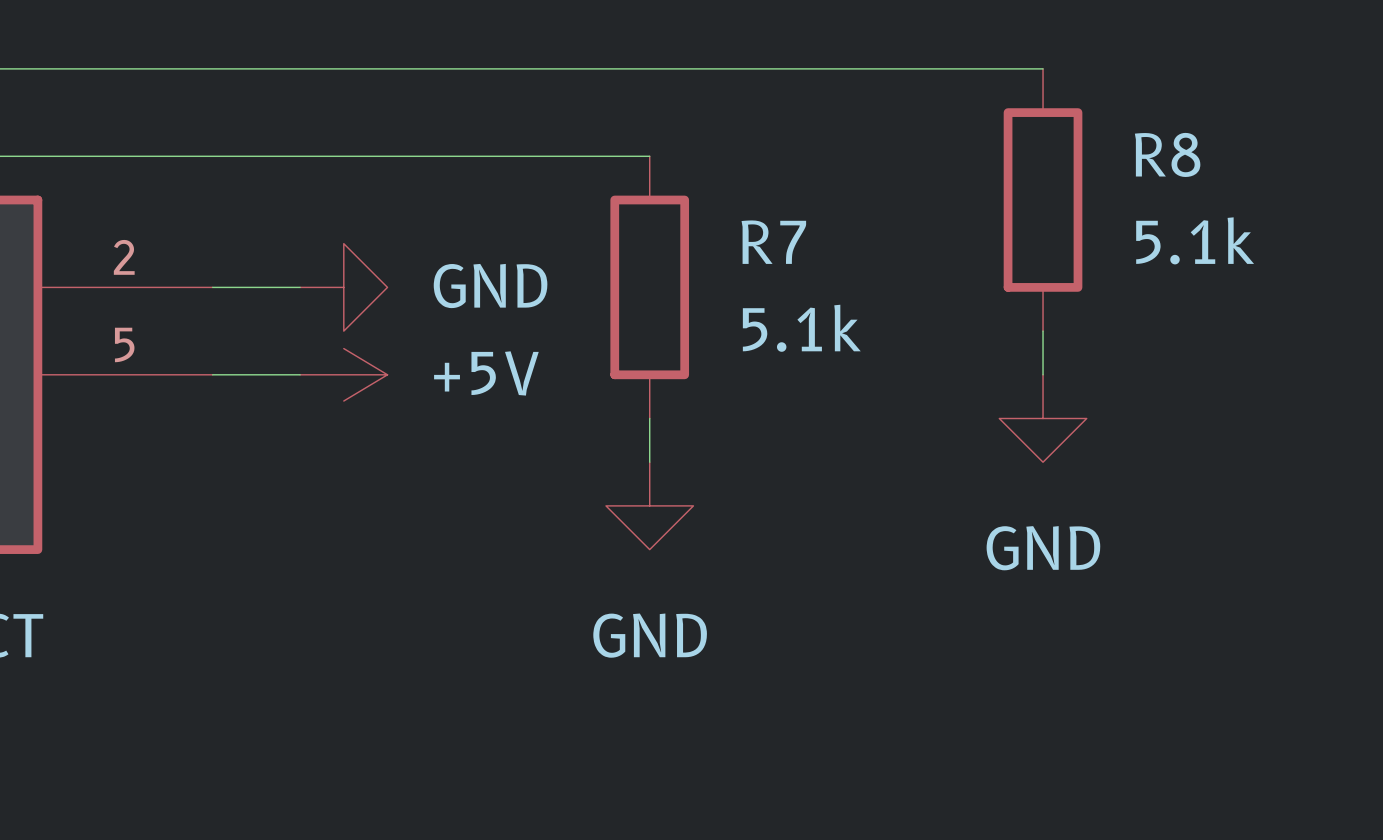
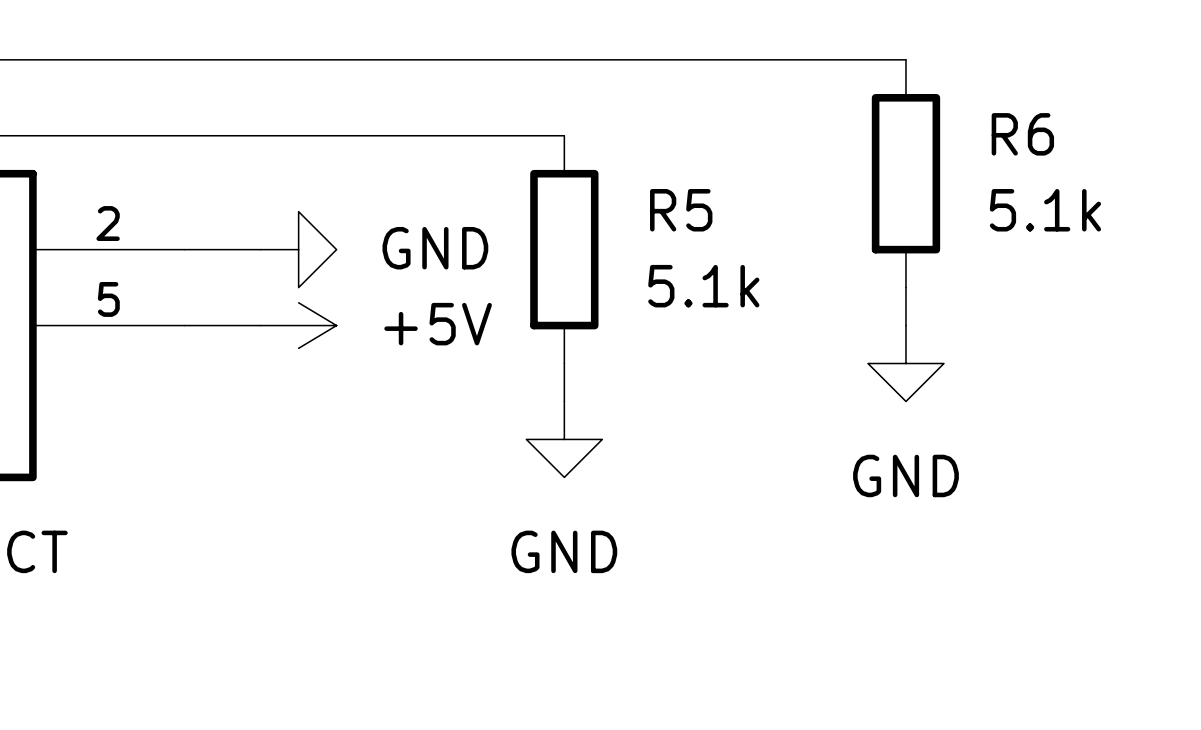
R8 name: R8 (1167, 154) -> R6 (1022, 134)
R7 name: R7 (773, 242) -> R5 (681, 210)

